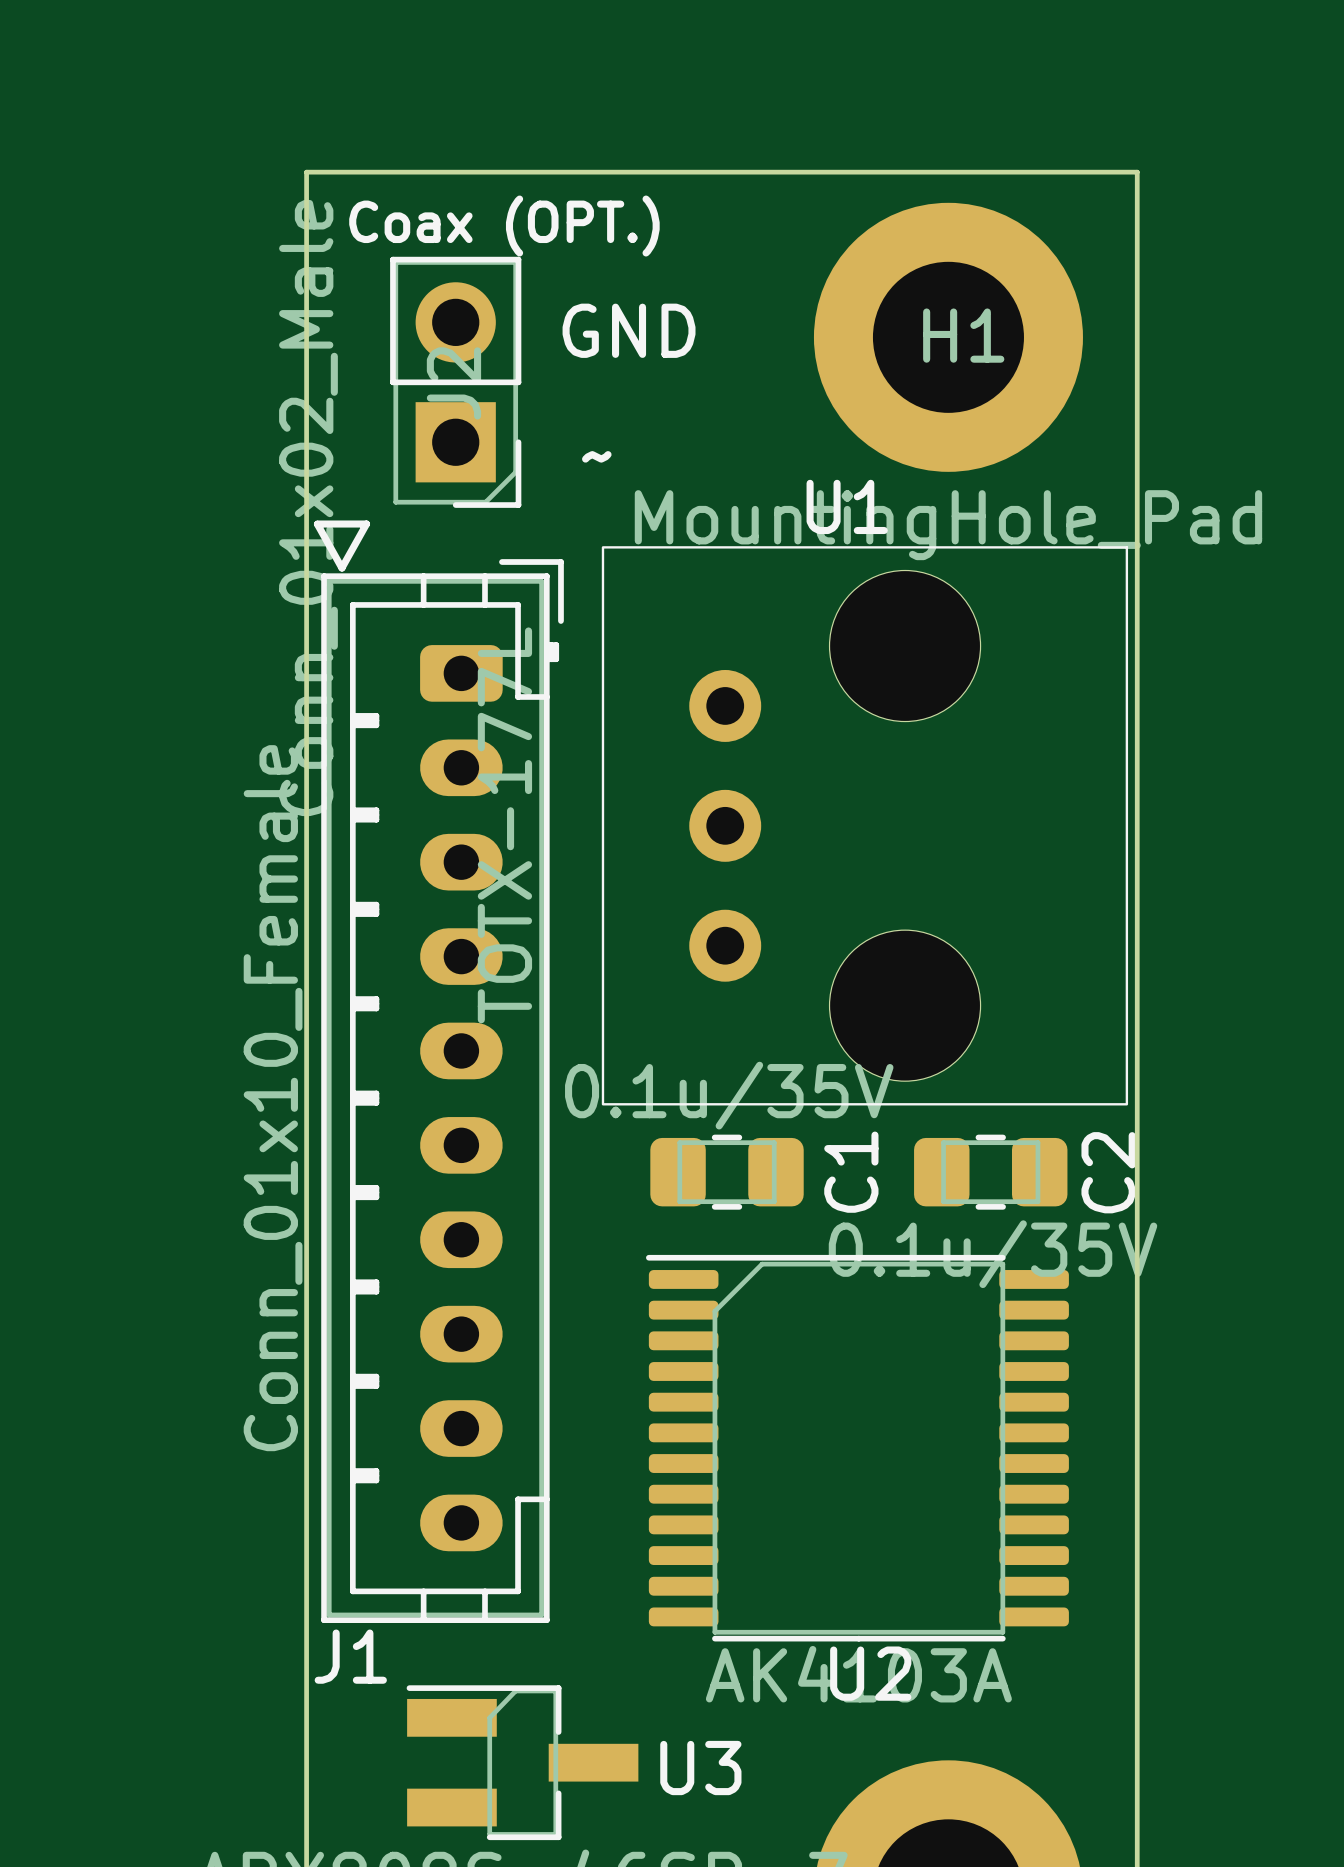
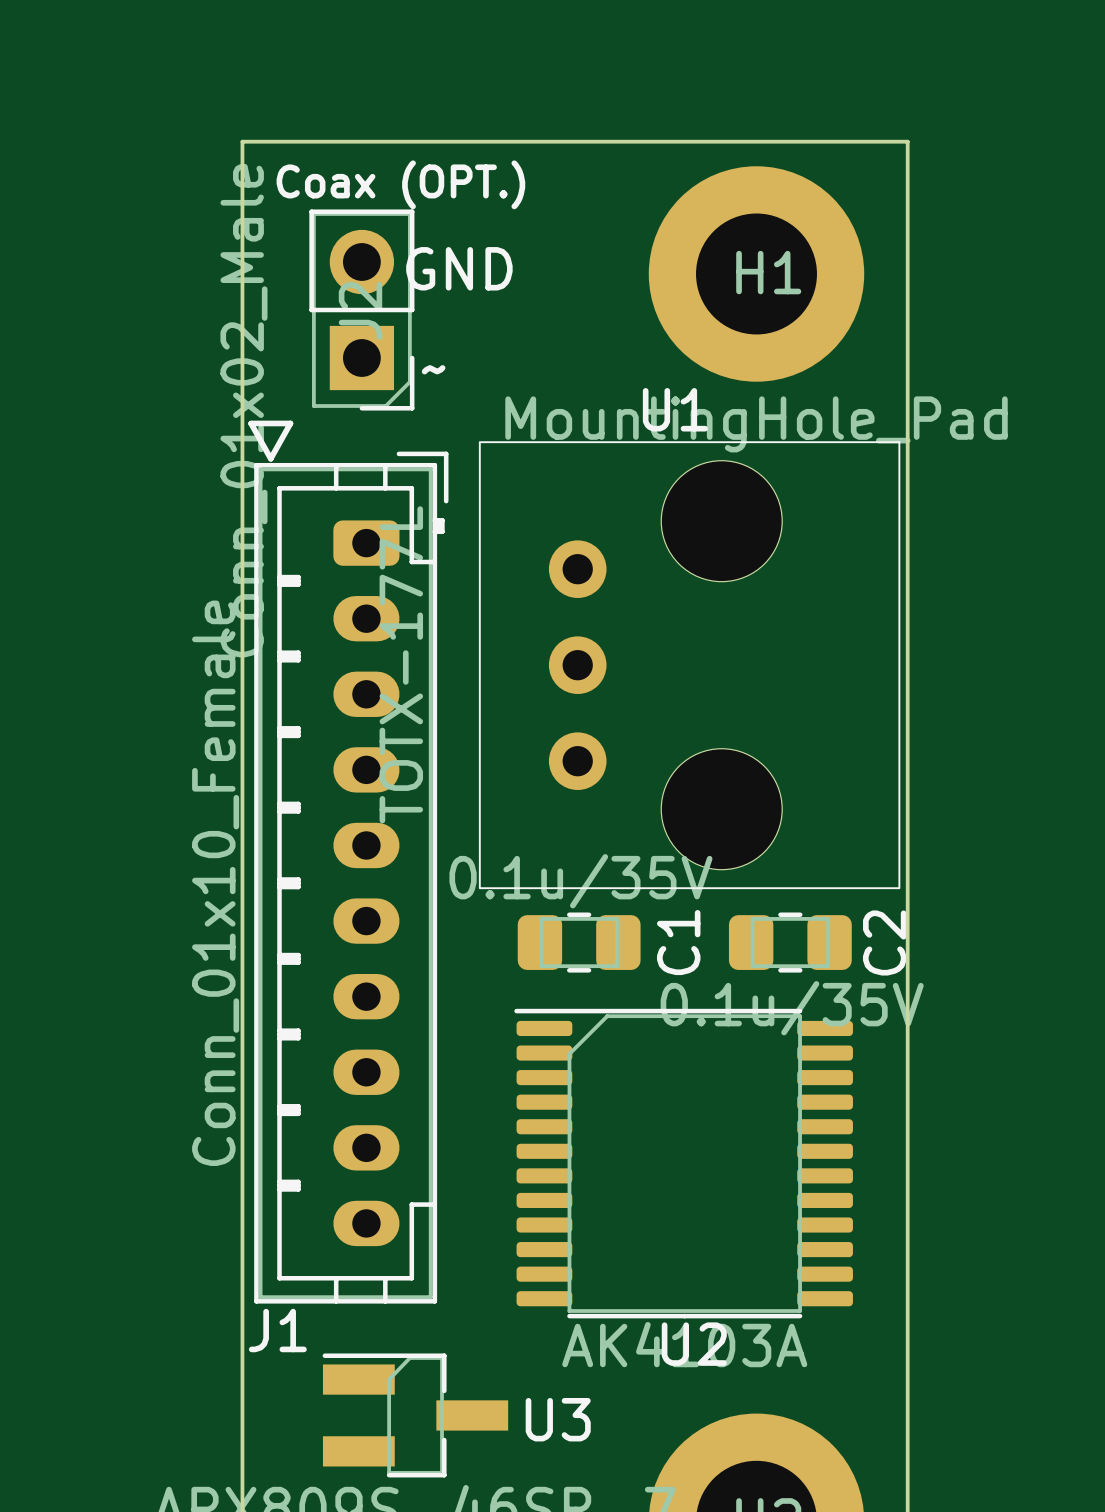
text position: GND (629, 330) -> GND (459, 268)
text position: ~ (596, 456) -> ~ (433, 369)

